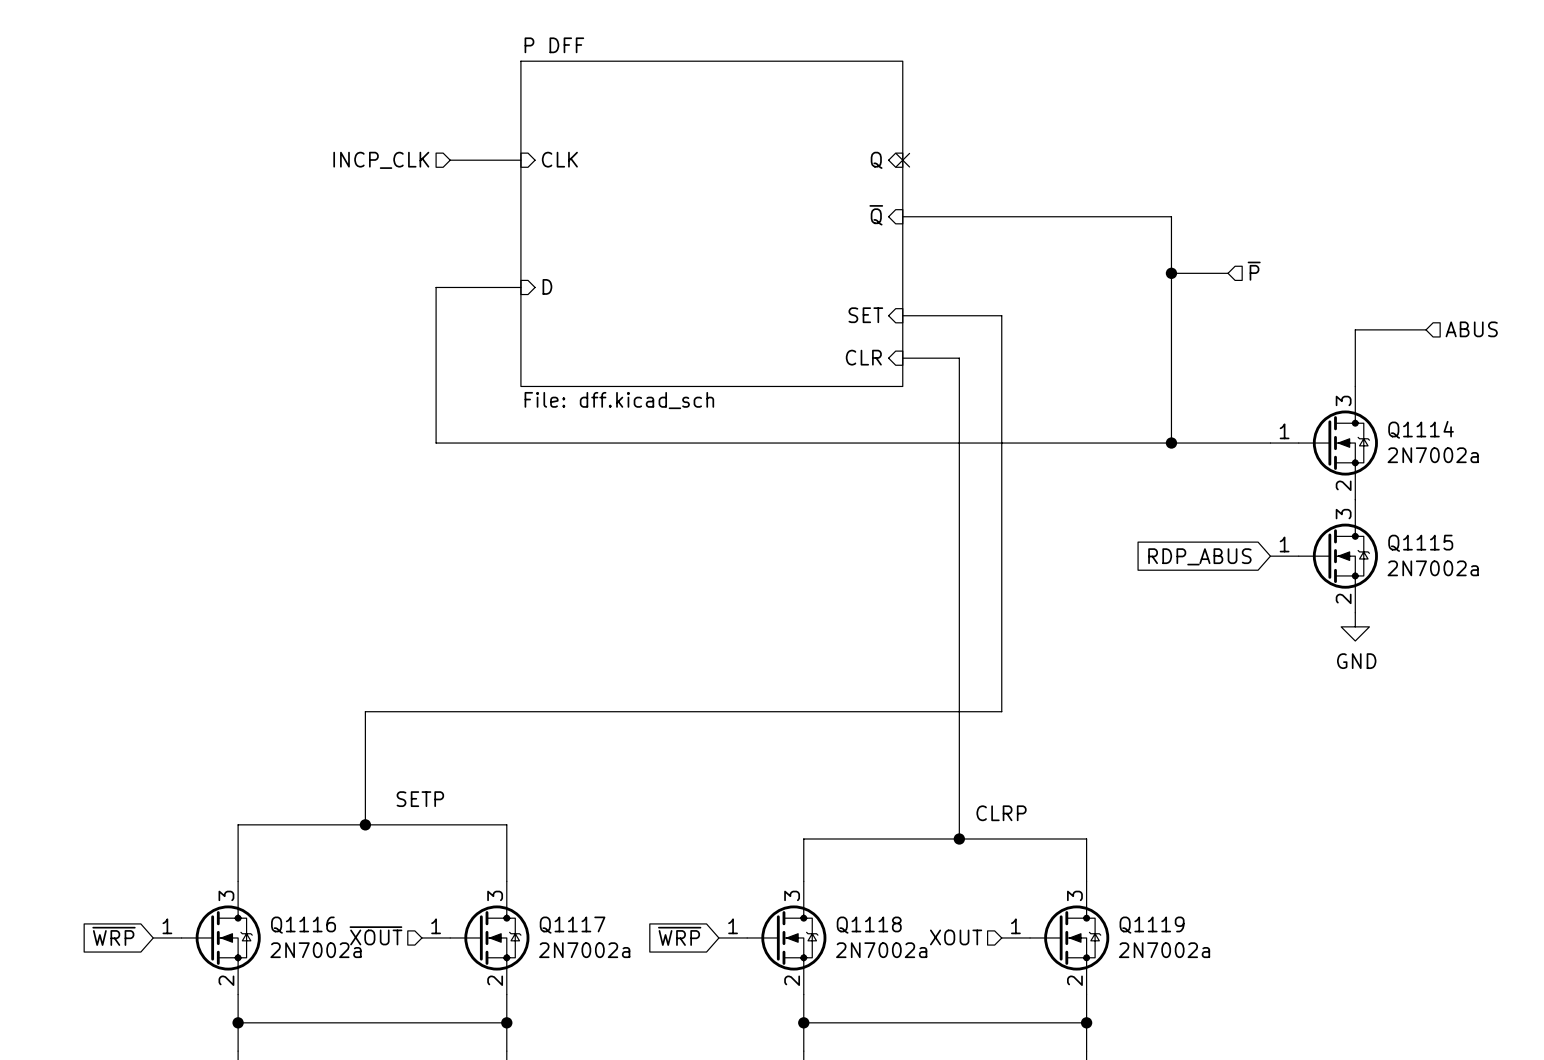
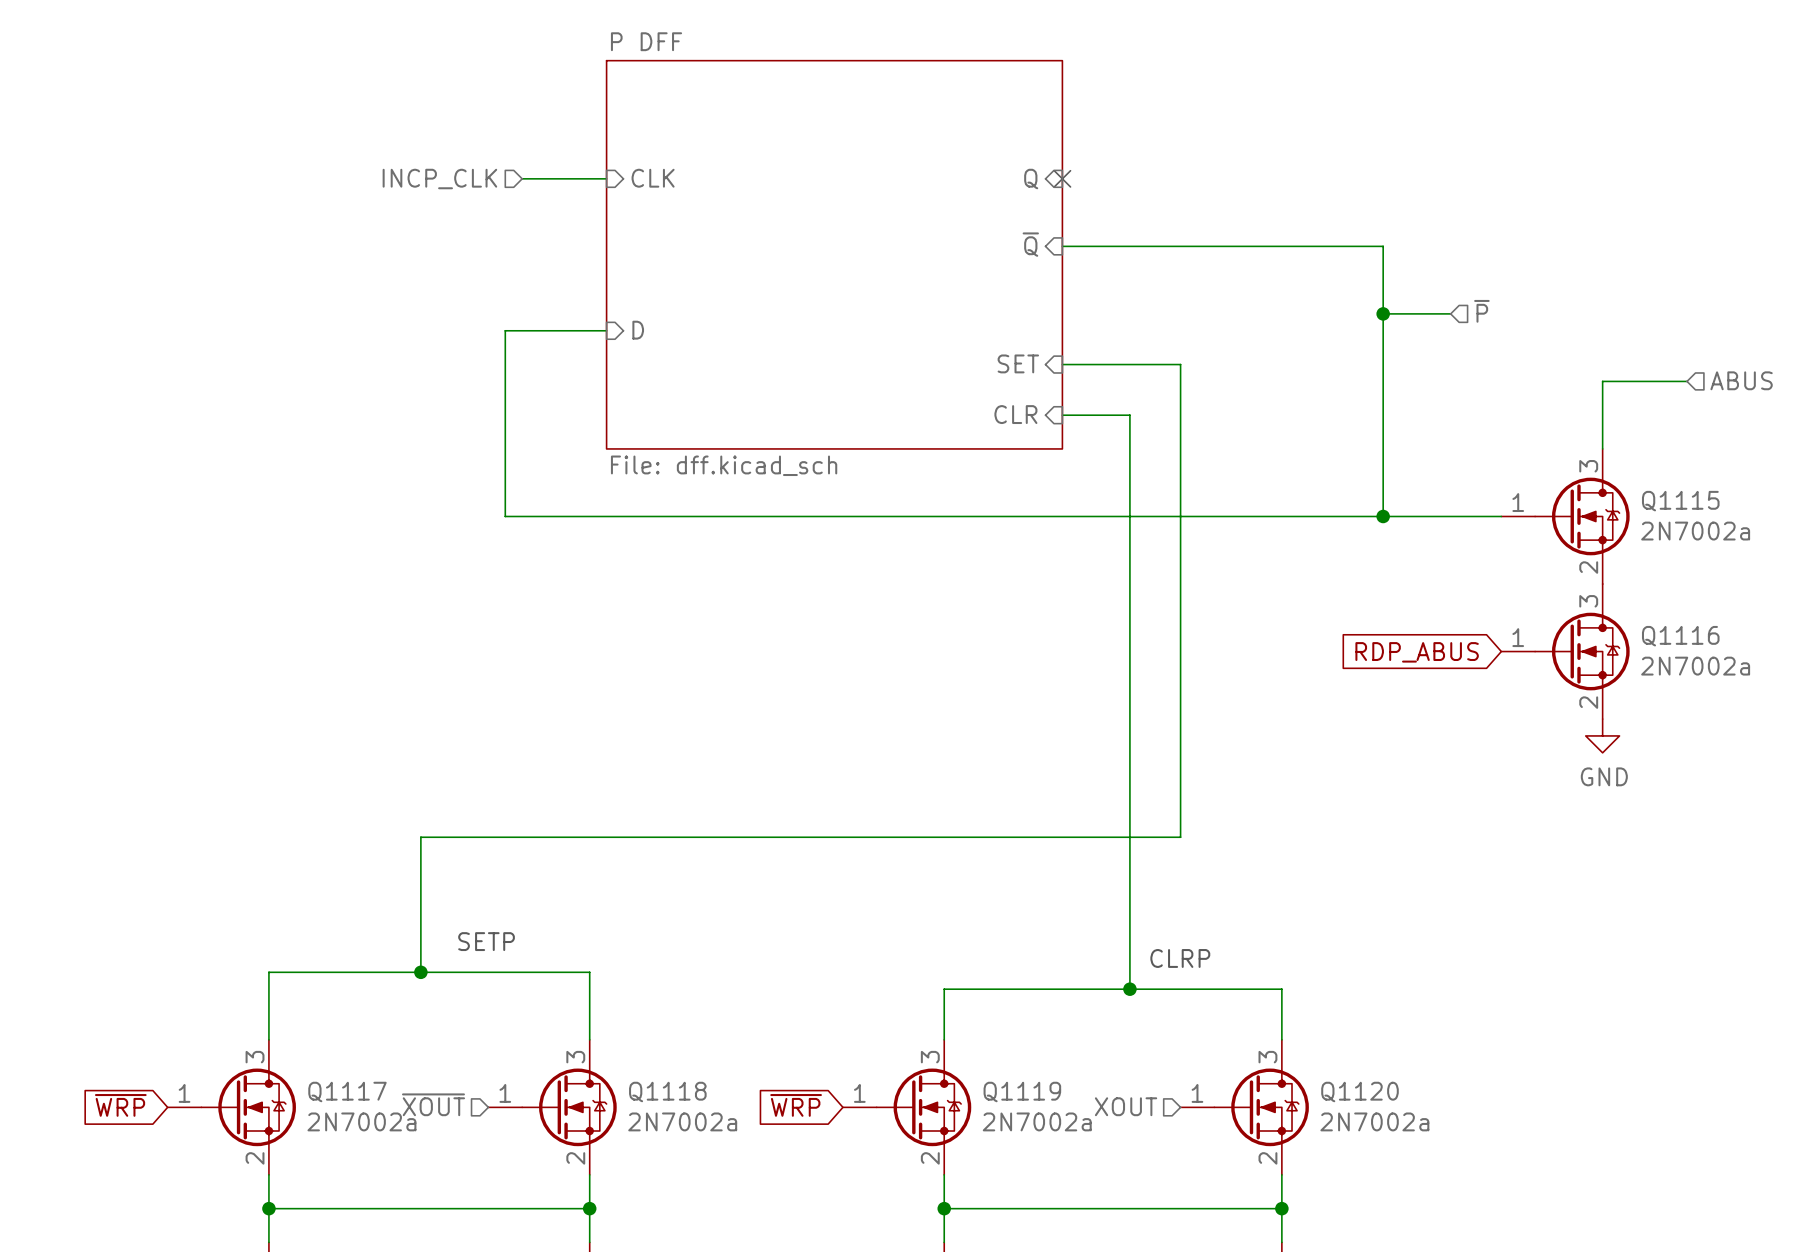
Q1114 name: Q1114 (1421, 429) -> Q1115 (1680, 501)
Q1115 name: Q1115 (1420, 543) -> Q1116 (1680, 636)
Q1116 name: Q1116 (303, 925) -> Q1117 (347, 1092)
Q1117 name: Q1117 (572, 925) -> Q1118 (667, 1092)
Q1118 name: Q1118 (869, 925) -> Q1119 (1022, 1092)
Q1119 name: Q1119 (1152, 925) -> Q1120 (1359, 1092)

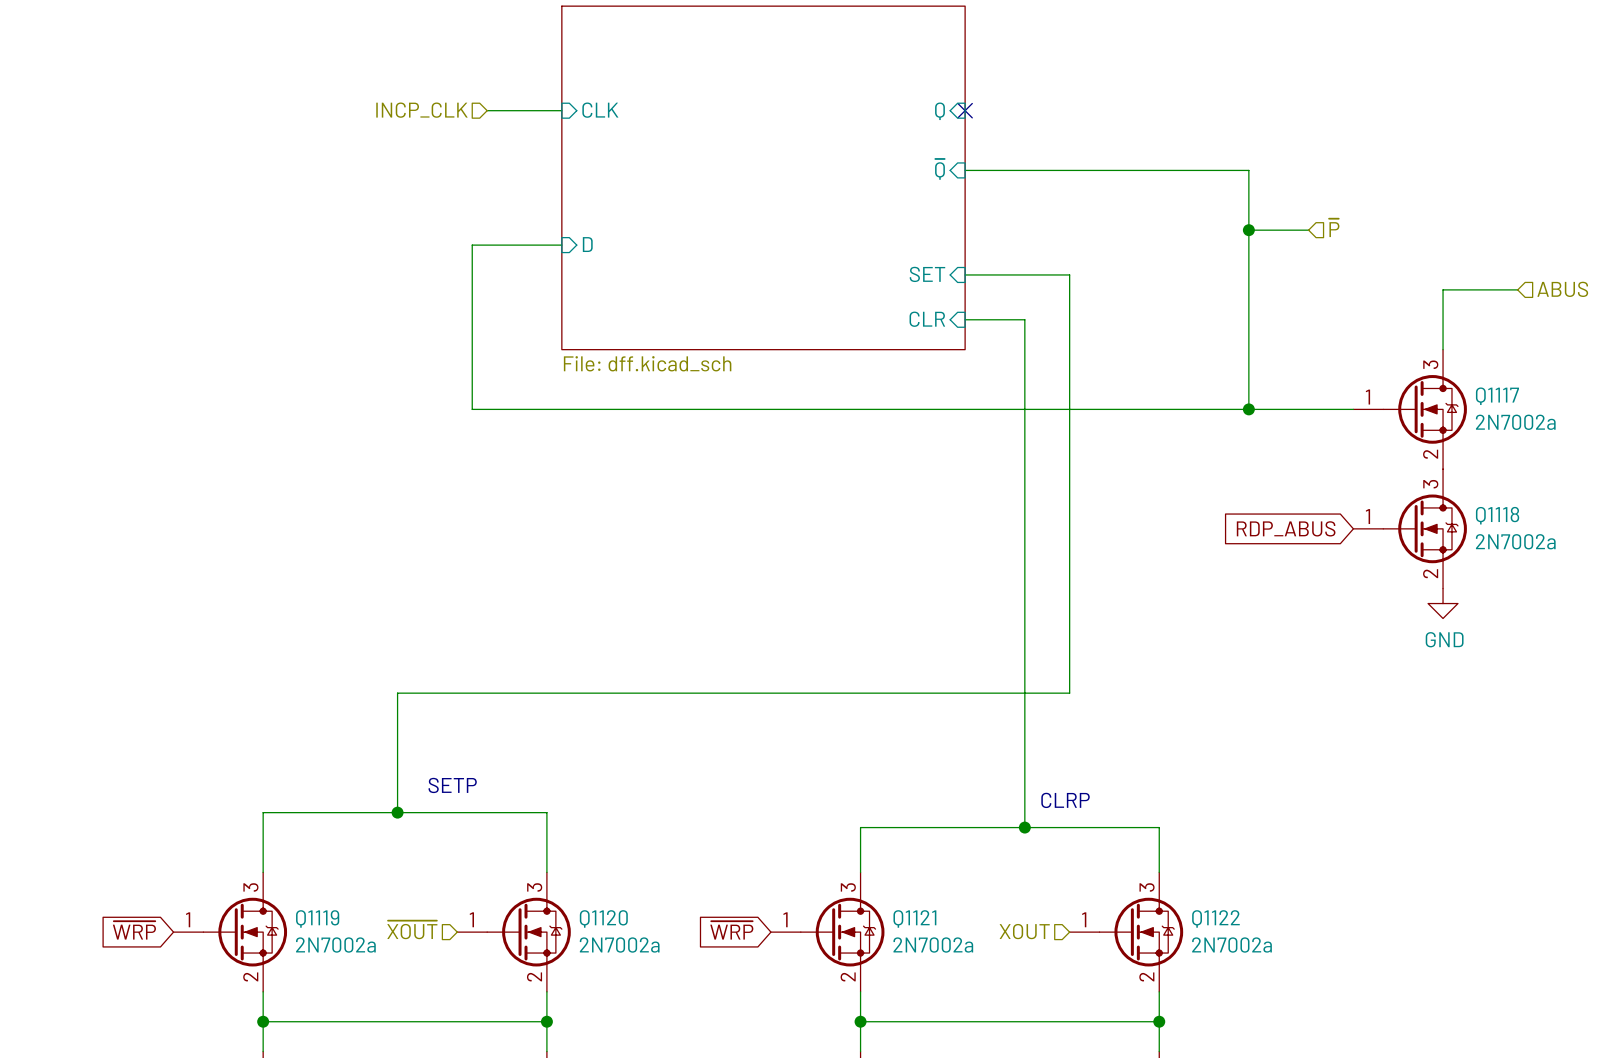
Q1115 name: Q1115 (1680, 501) -> Q1117 (1497, 396)
Q1116 name: Q1116 (1680, 636) -> Q1118 (1497, 515)
Q1117 name: Q1117 (347, 1092) -> Q1119 (317, 918)
Q1118 name: Q1118 (667, 1092) -> Q1120 (603, 918)
Q1119 name: Q1119 (1022, 1092) -> Q1121 (914, 918)
Q1120 name: Q1120 (1359, 1092) -> Q1122 (1215, 918)

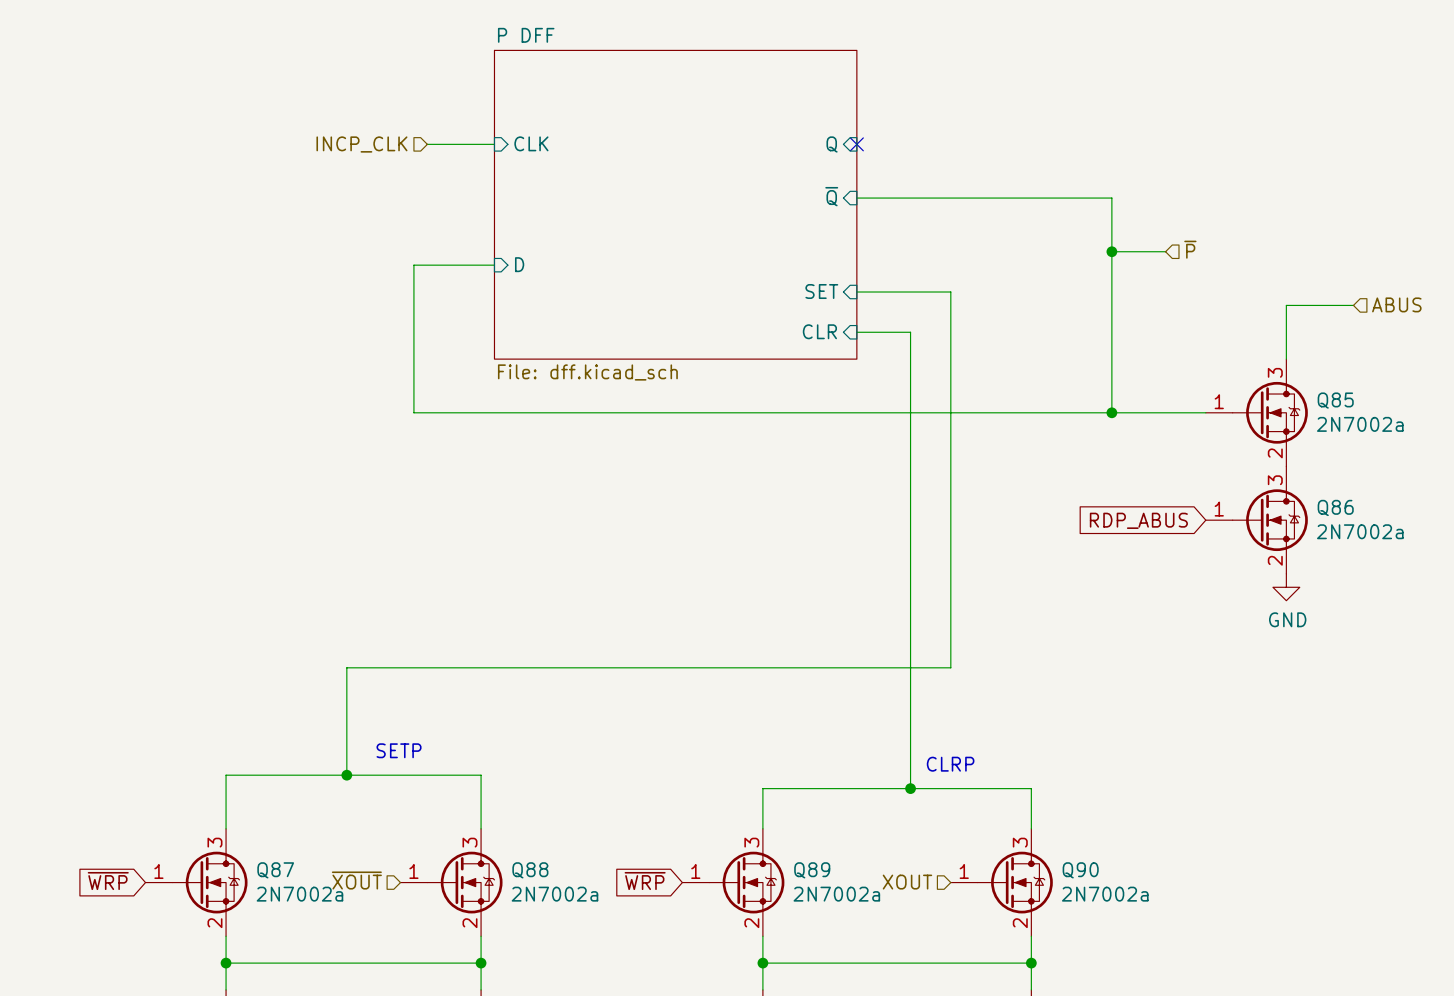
Q1117 name: Q1117 (1497, 396) -> Q85 (1335, 400)
Q1118 name: Q1118 (1497, 515) -> Q86 (1335, 507)
Q1119 name: Q1119 (317, 918) -> Q87 (275, 870)
Q1120 name: Q1120 (603, 918) -> Q88 (530, 870)
Q1121 name: Q1121 (914, 918) -> Q89 (812, 870)
Q1122 name: Q1122 (1215, 918) -> Q90 (1080, 870)

